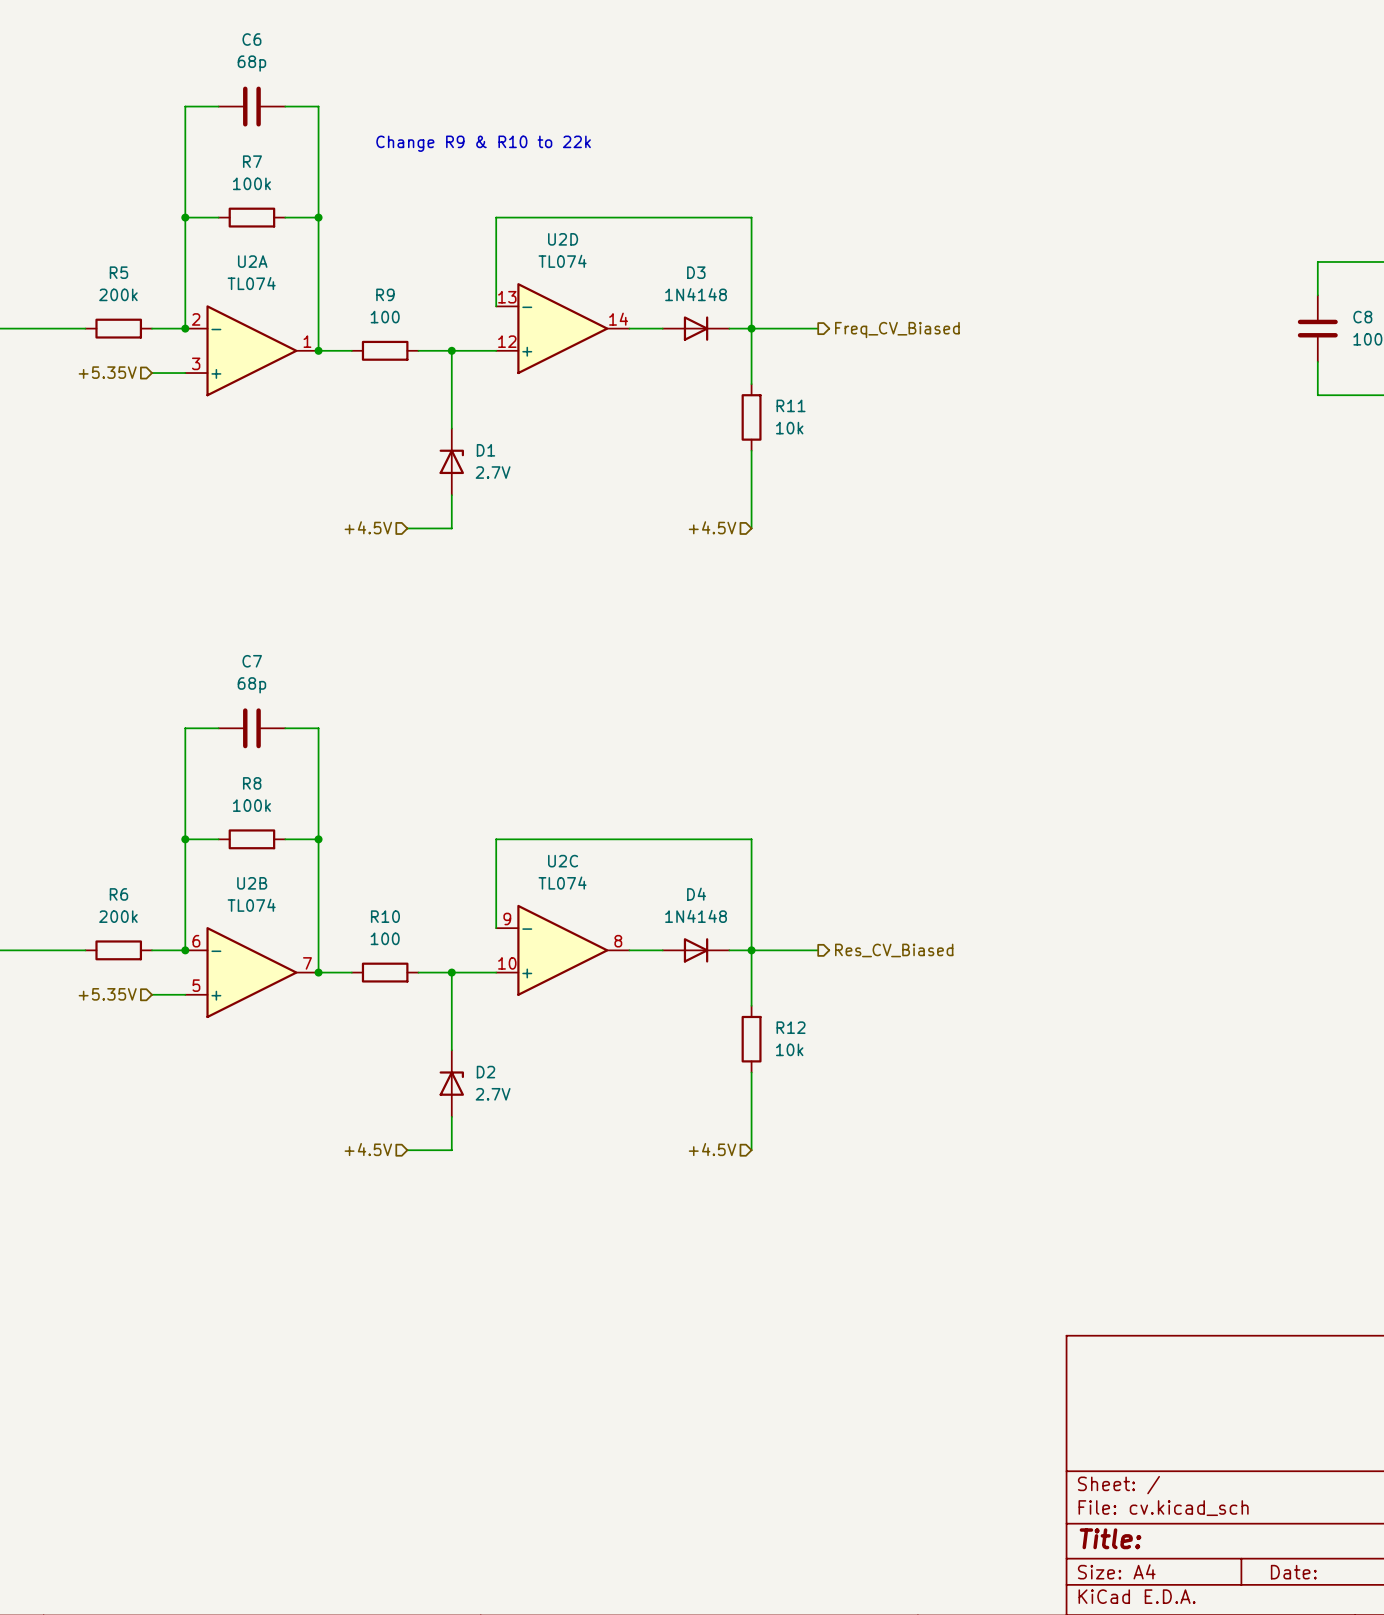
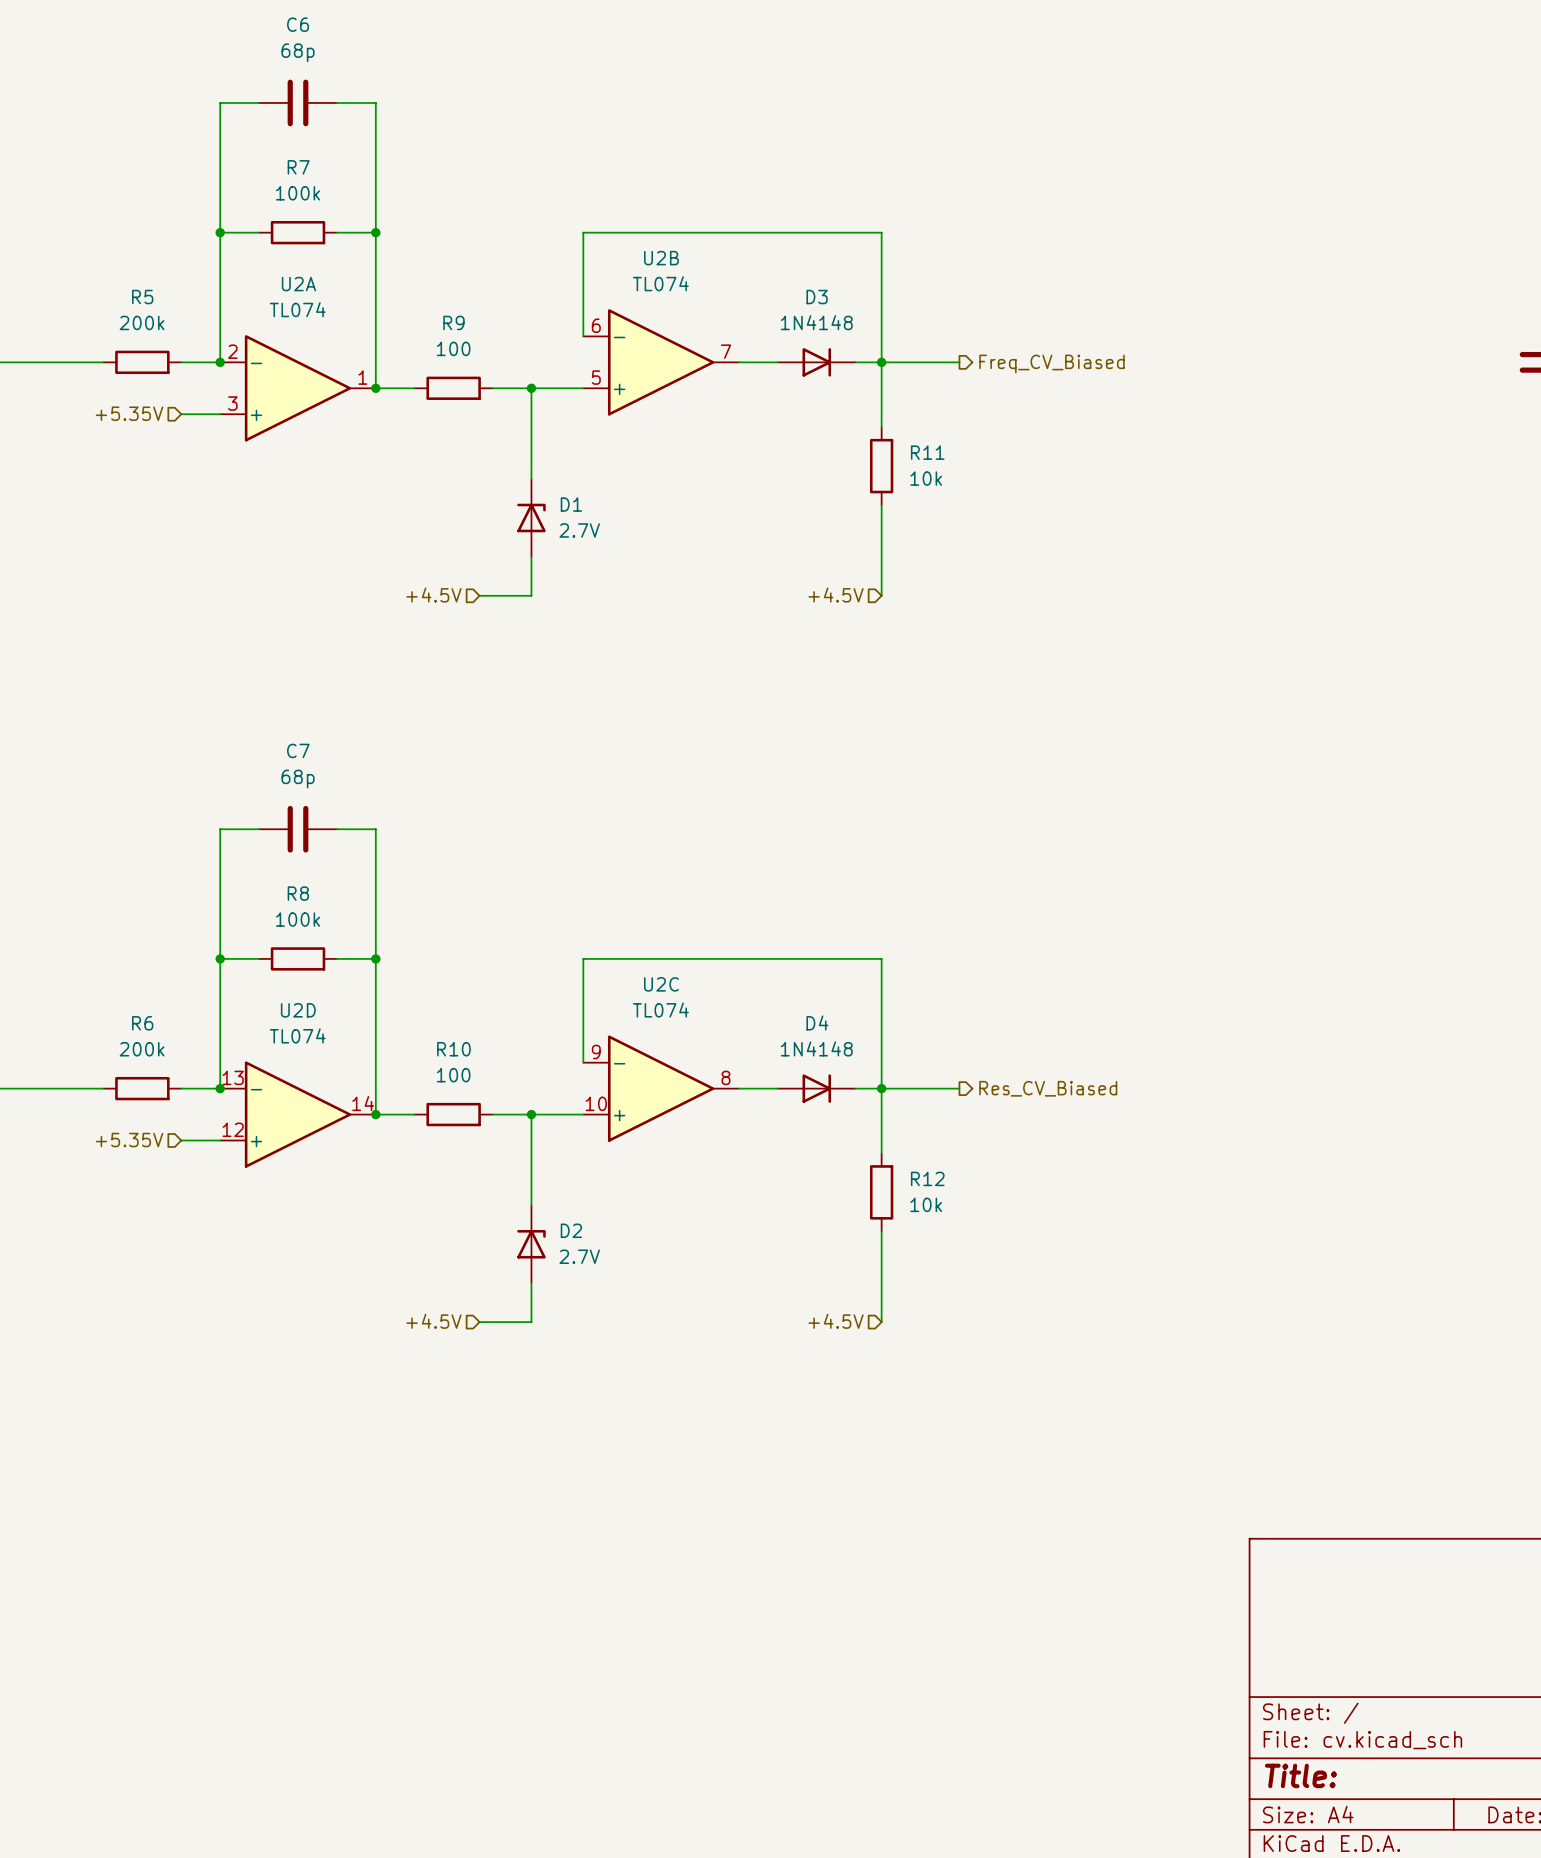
text: Change R9 & R10 to 22k (483, 143) -> none
U2D position: (562, 328) -> (298, 1114)
U2B position: (251, 972) -> (661, 362)

